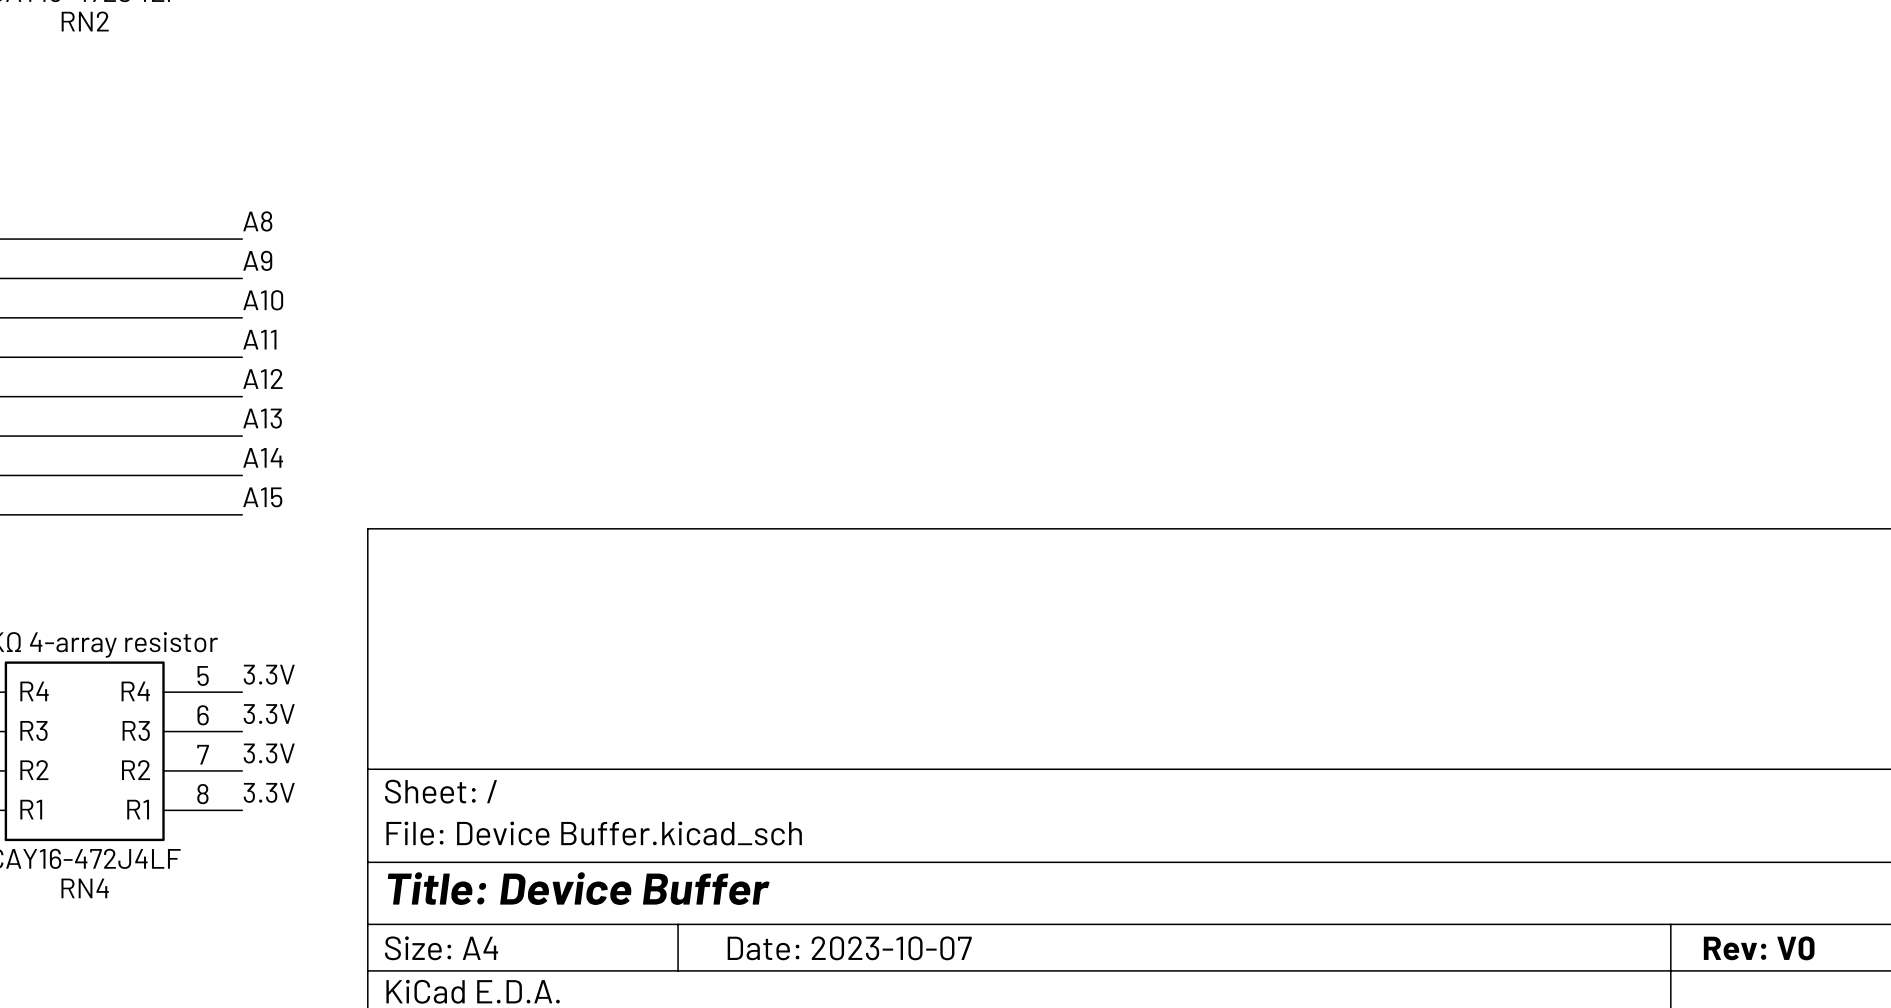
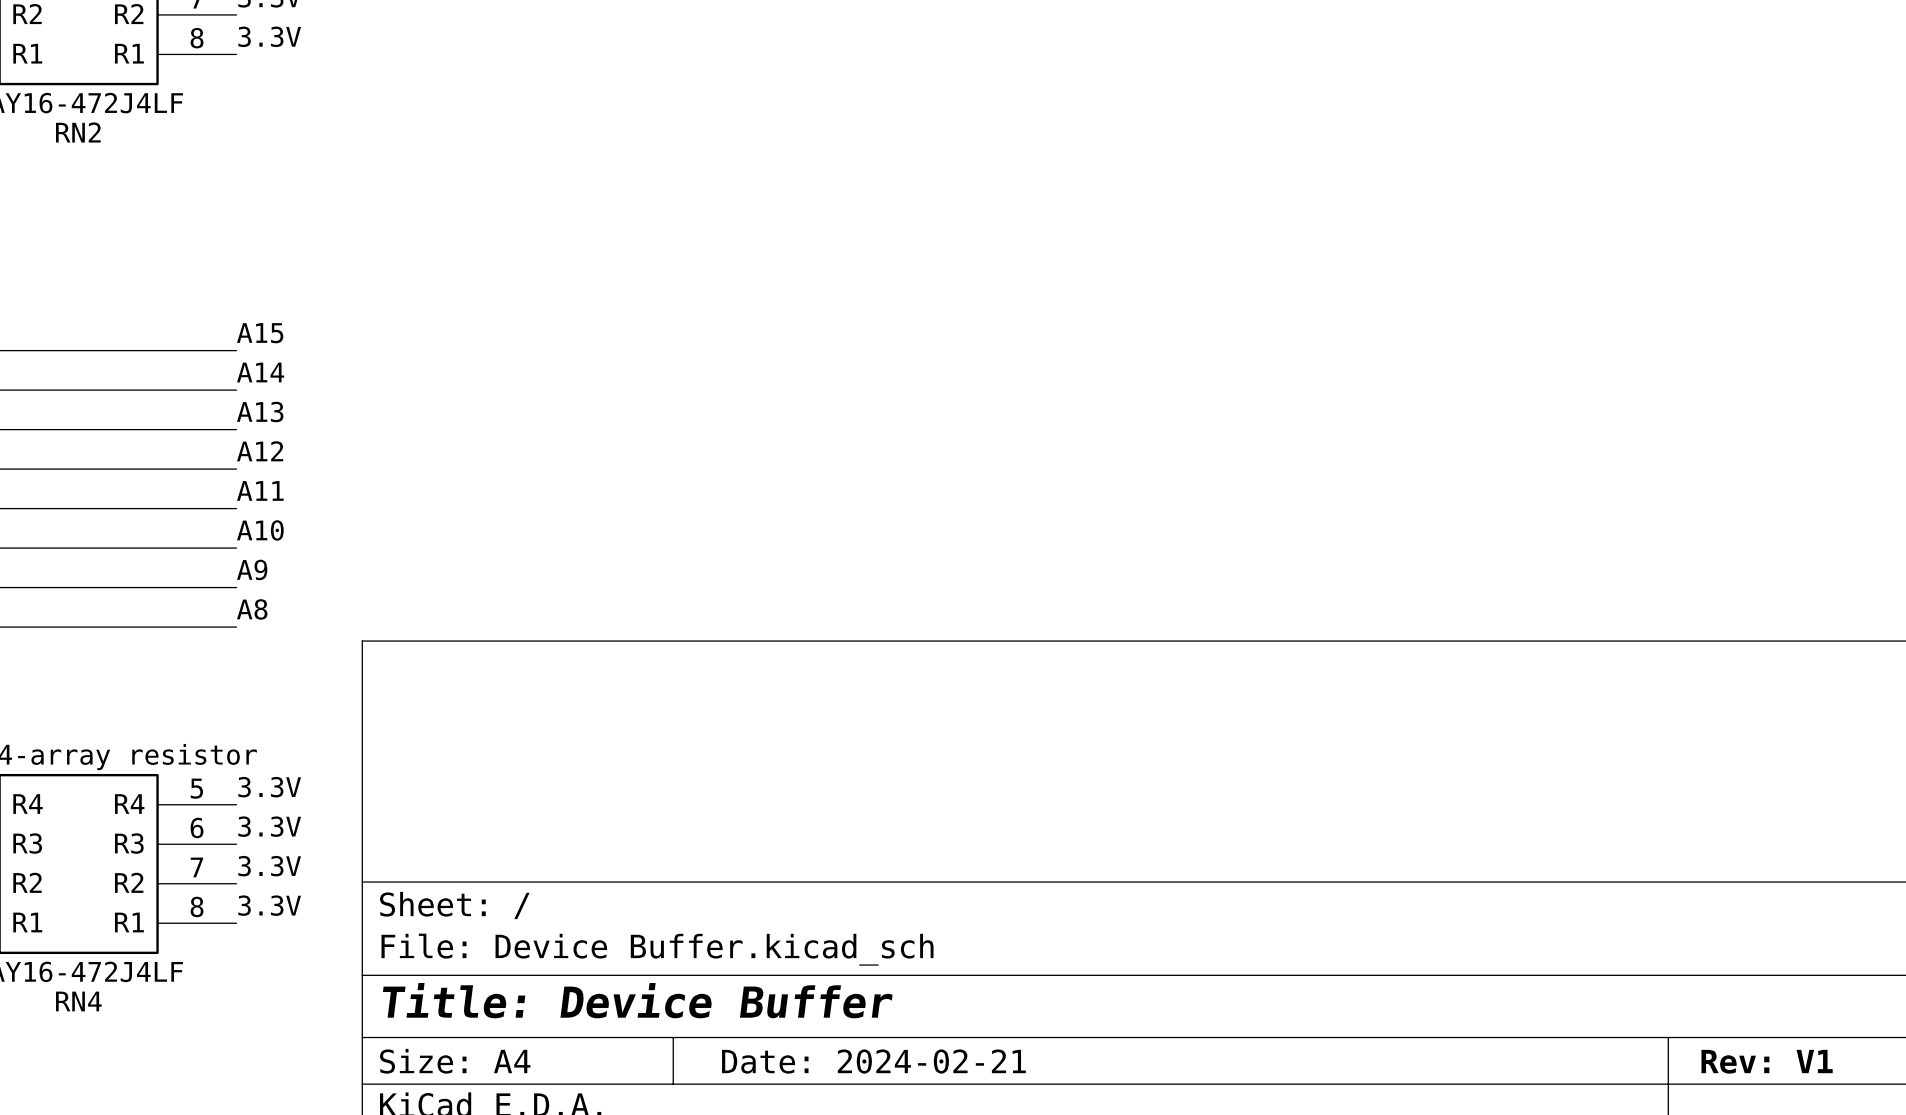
label: A8 (257, 221) -> A15 (260, 333)
label: A9 (257, 260) -> A14 (260, 372)
label: A10 (263, 300) -> A13 (260, 411)
label: A11 (259, 339) -> A12 (260, 451)
label: A12 (262, 378) -> A11 (260, 490)
label: A13 (262, 418) -> A10 (260, 530)
label: A14 (263, 457) -> A9 (252, 569)
label: A15 (262, 497) -> A8 (252, 609)
title block: Date: 2023-10-07 (849, 948) -> Date: 2024-02-21 (873, 1061)
title block: Rev: V0 (1759, 948) -> Rev: V1 (1767, 1061)

